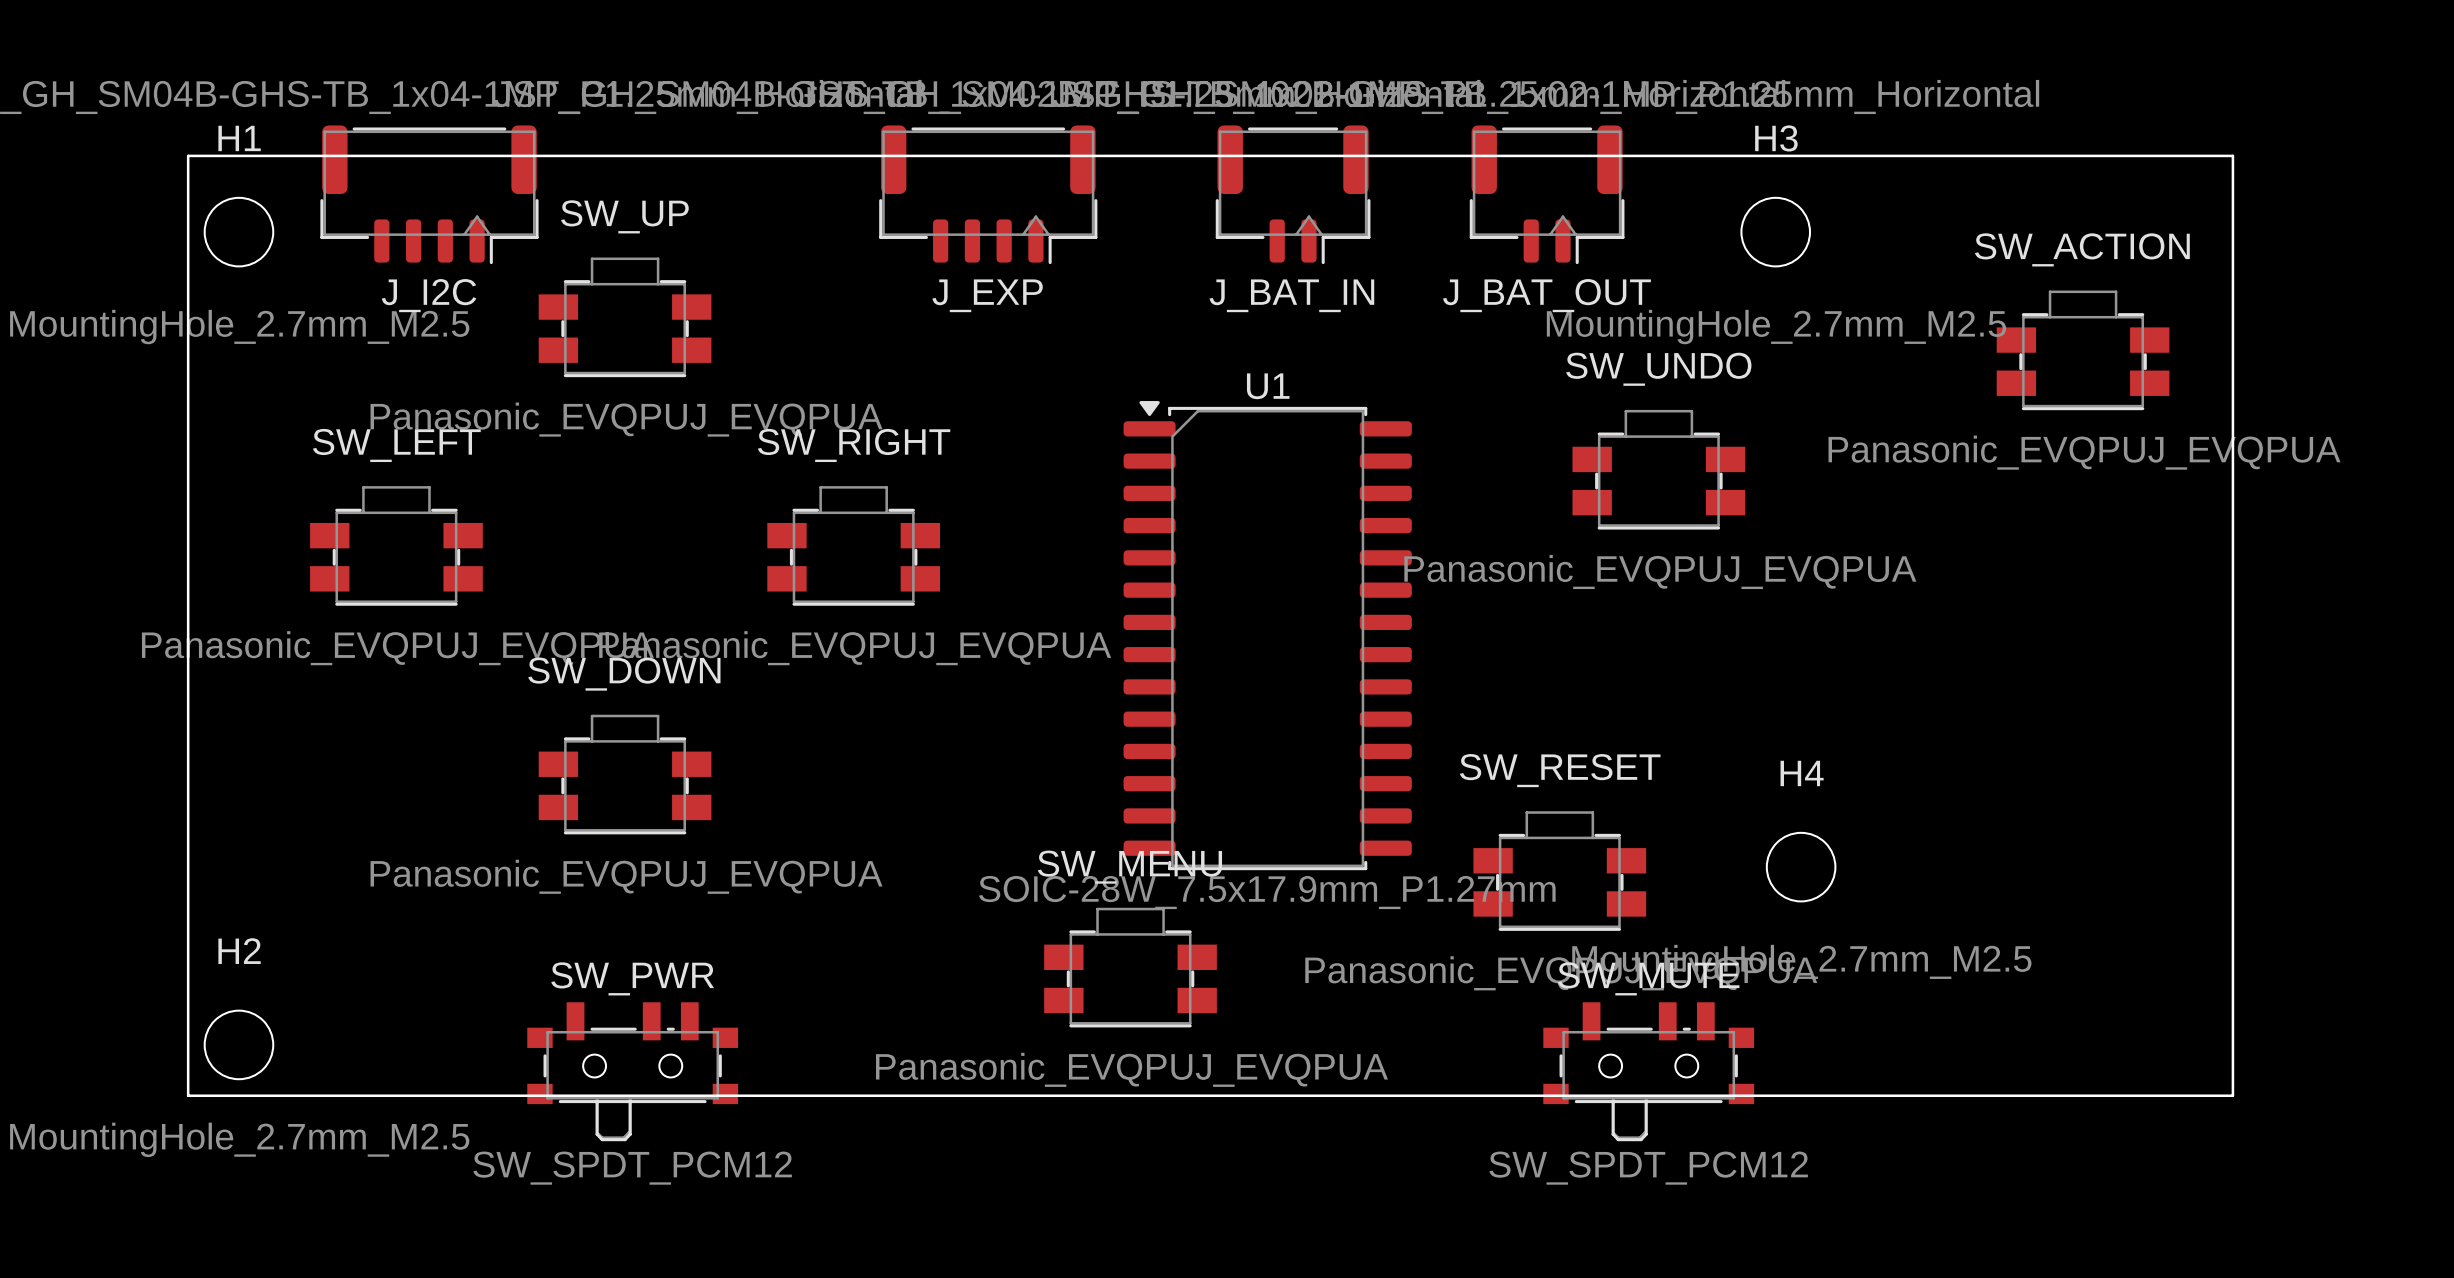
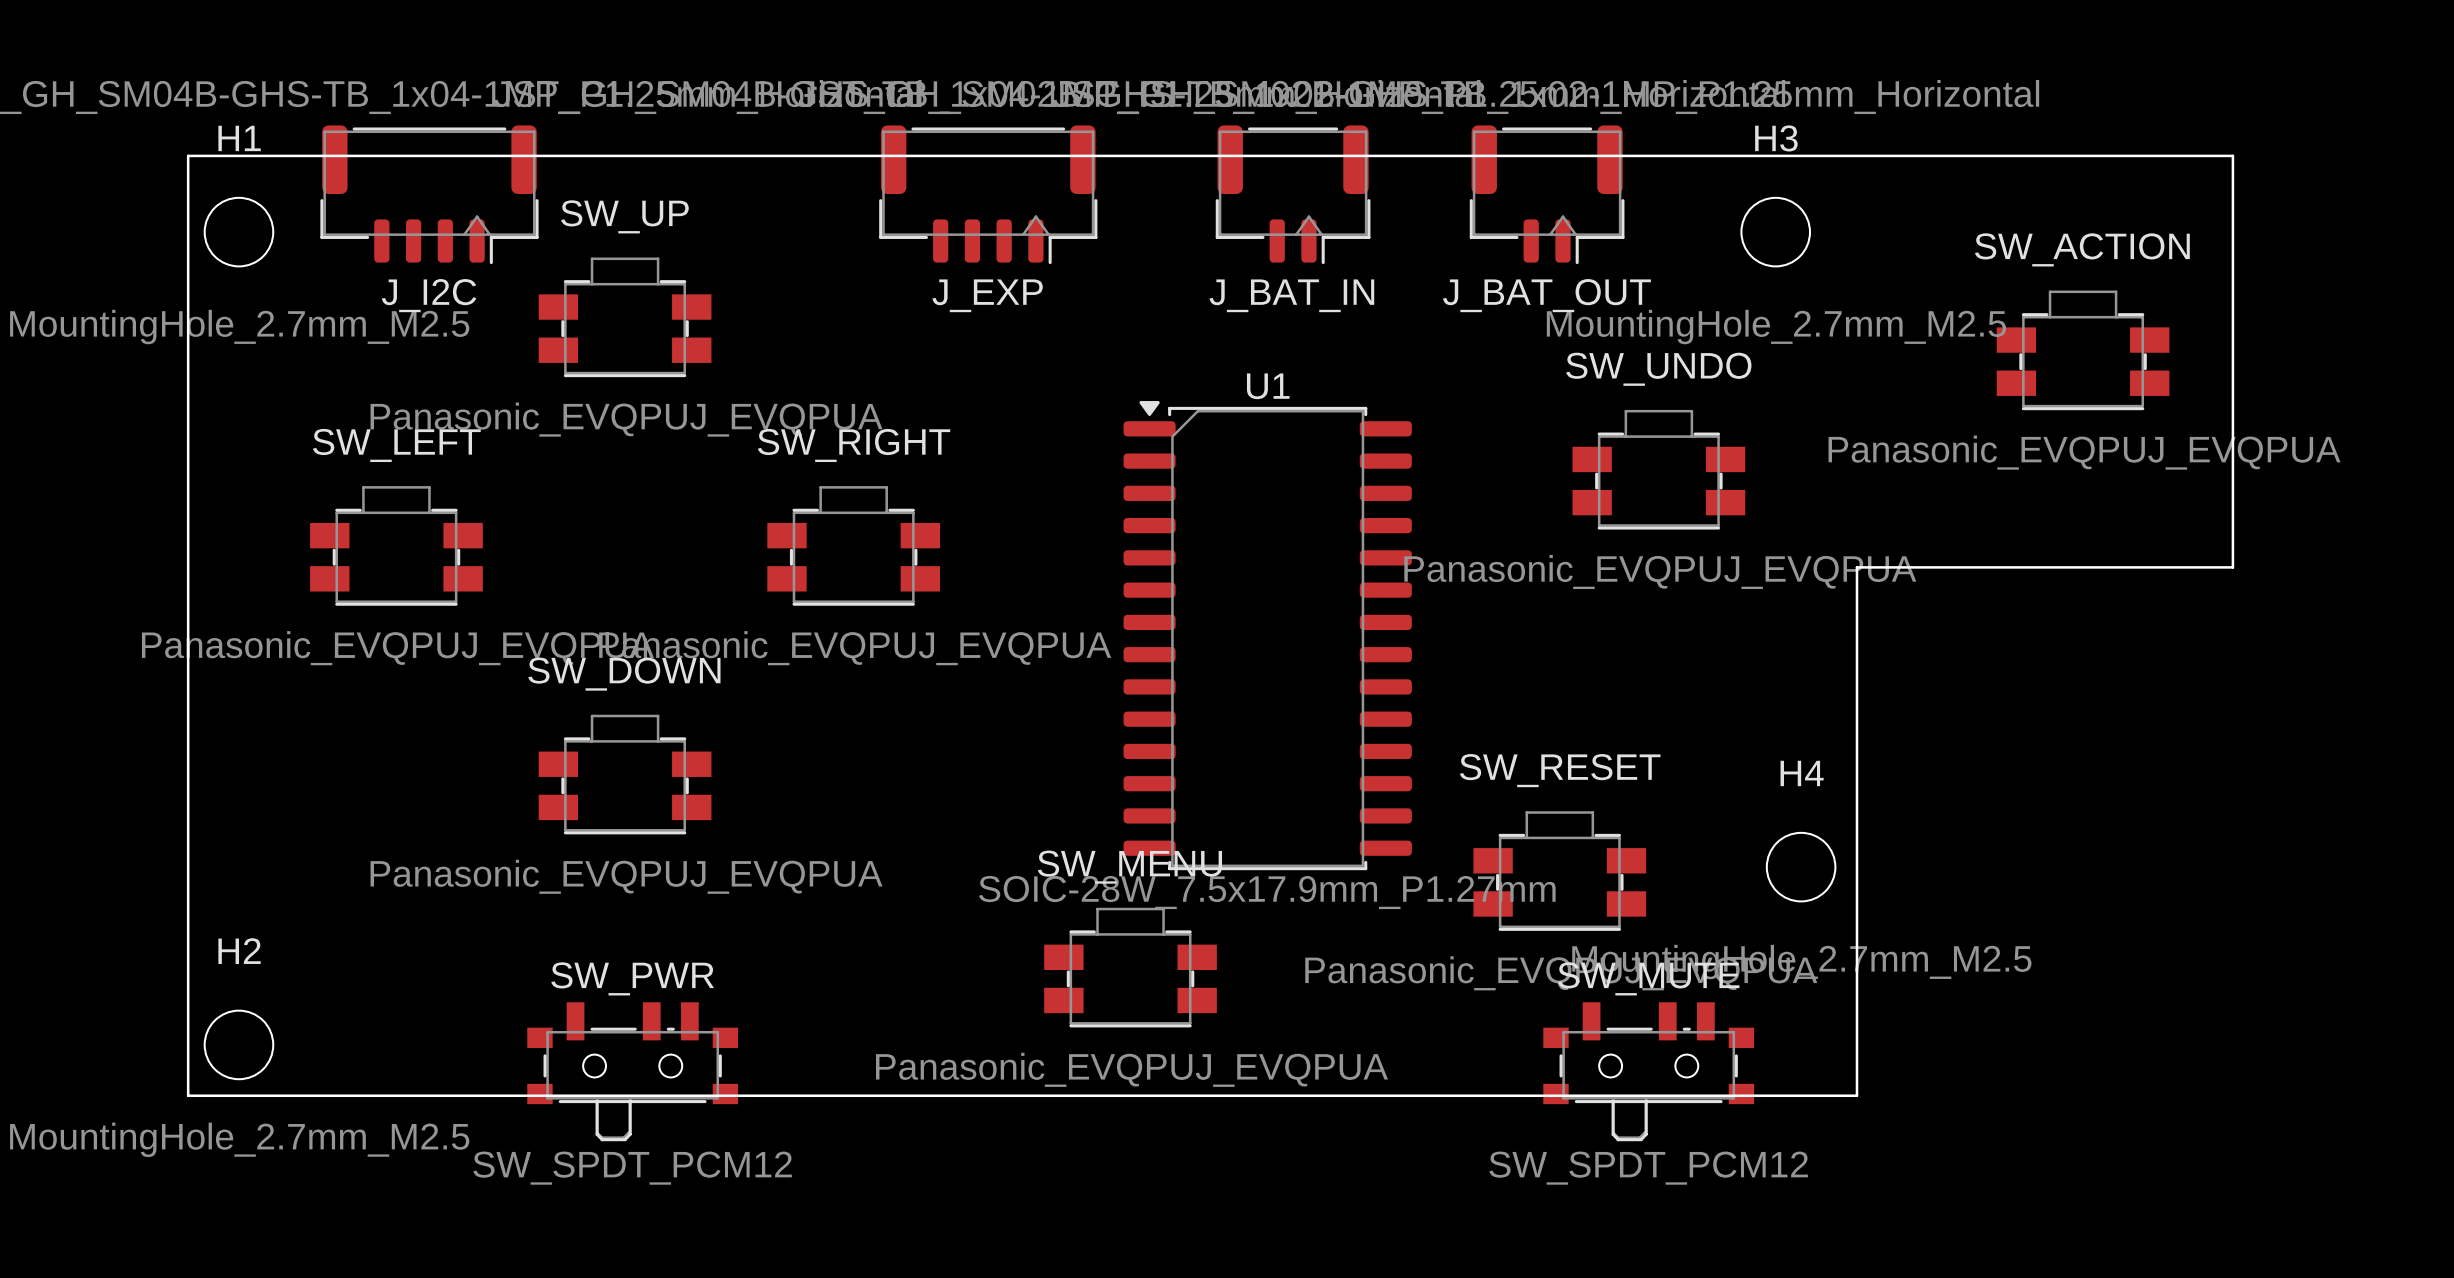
board edge: (2232, 567) (2232, 1095) (1856, 1095) -> (2232, 567) (1856, 567) (1856, 1095)

